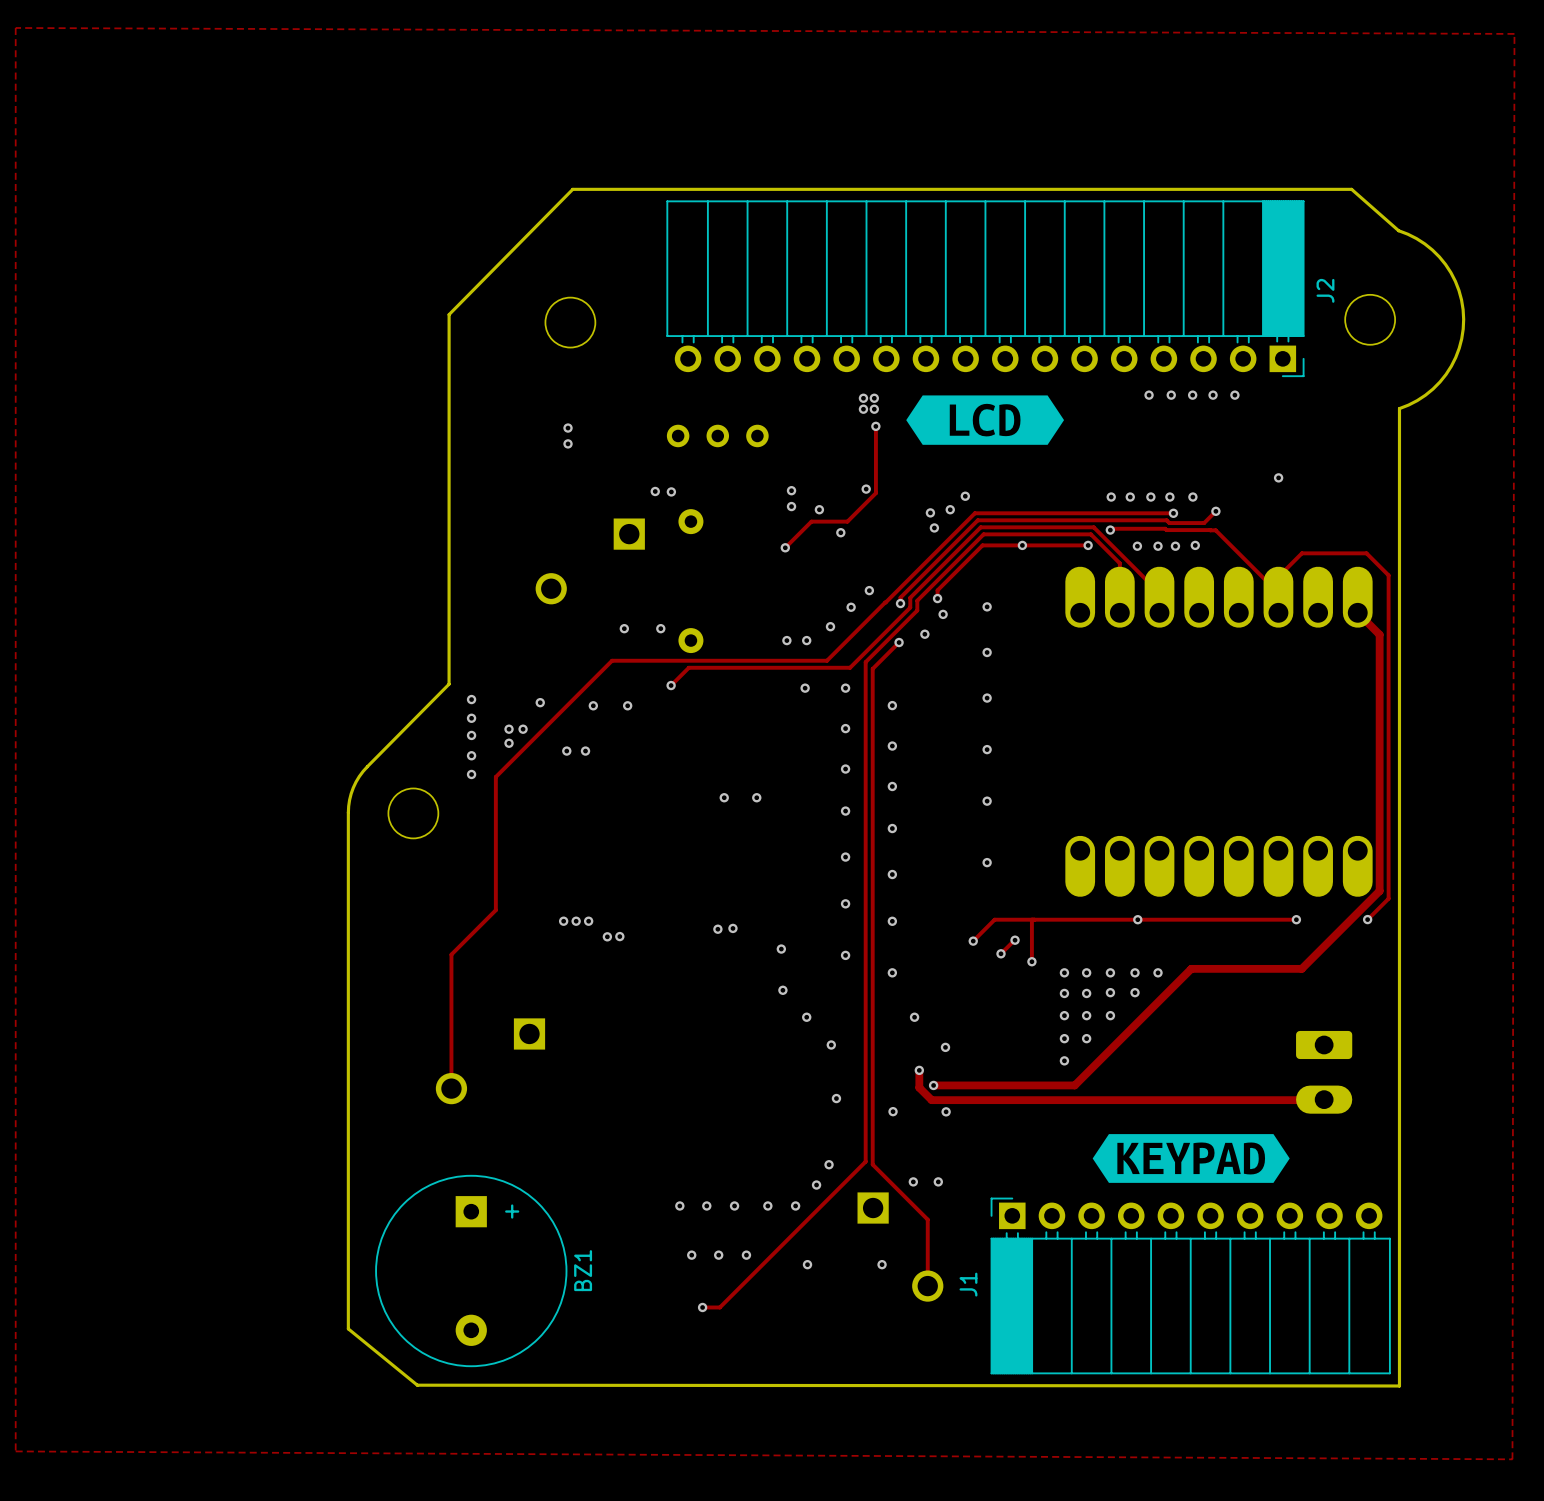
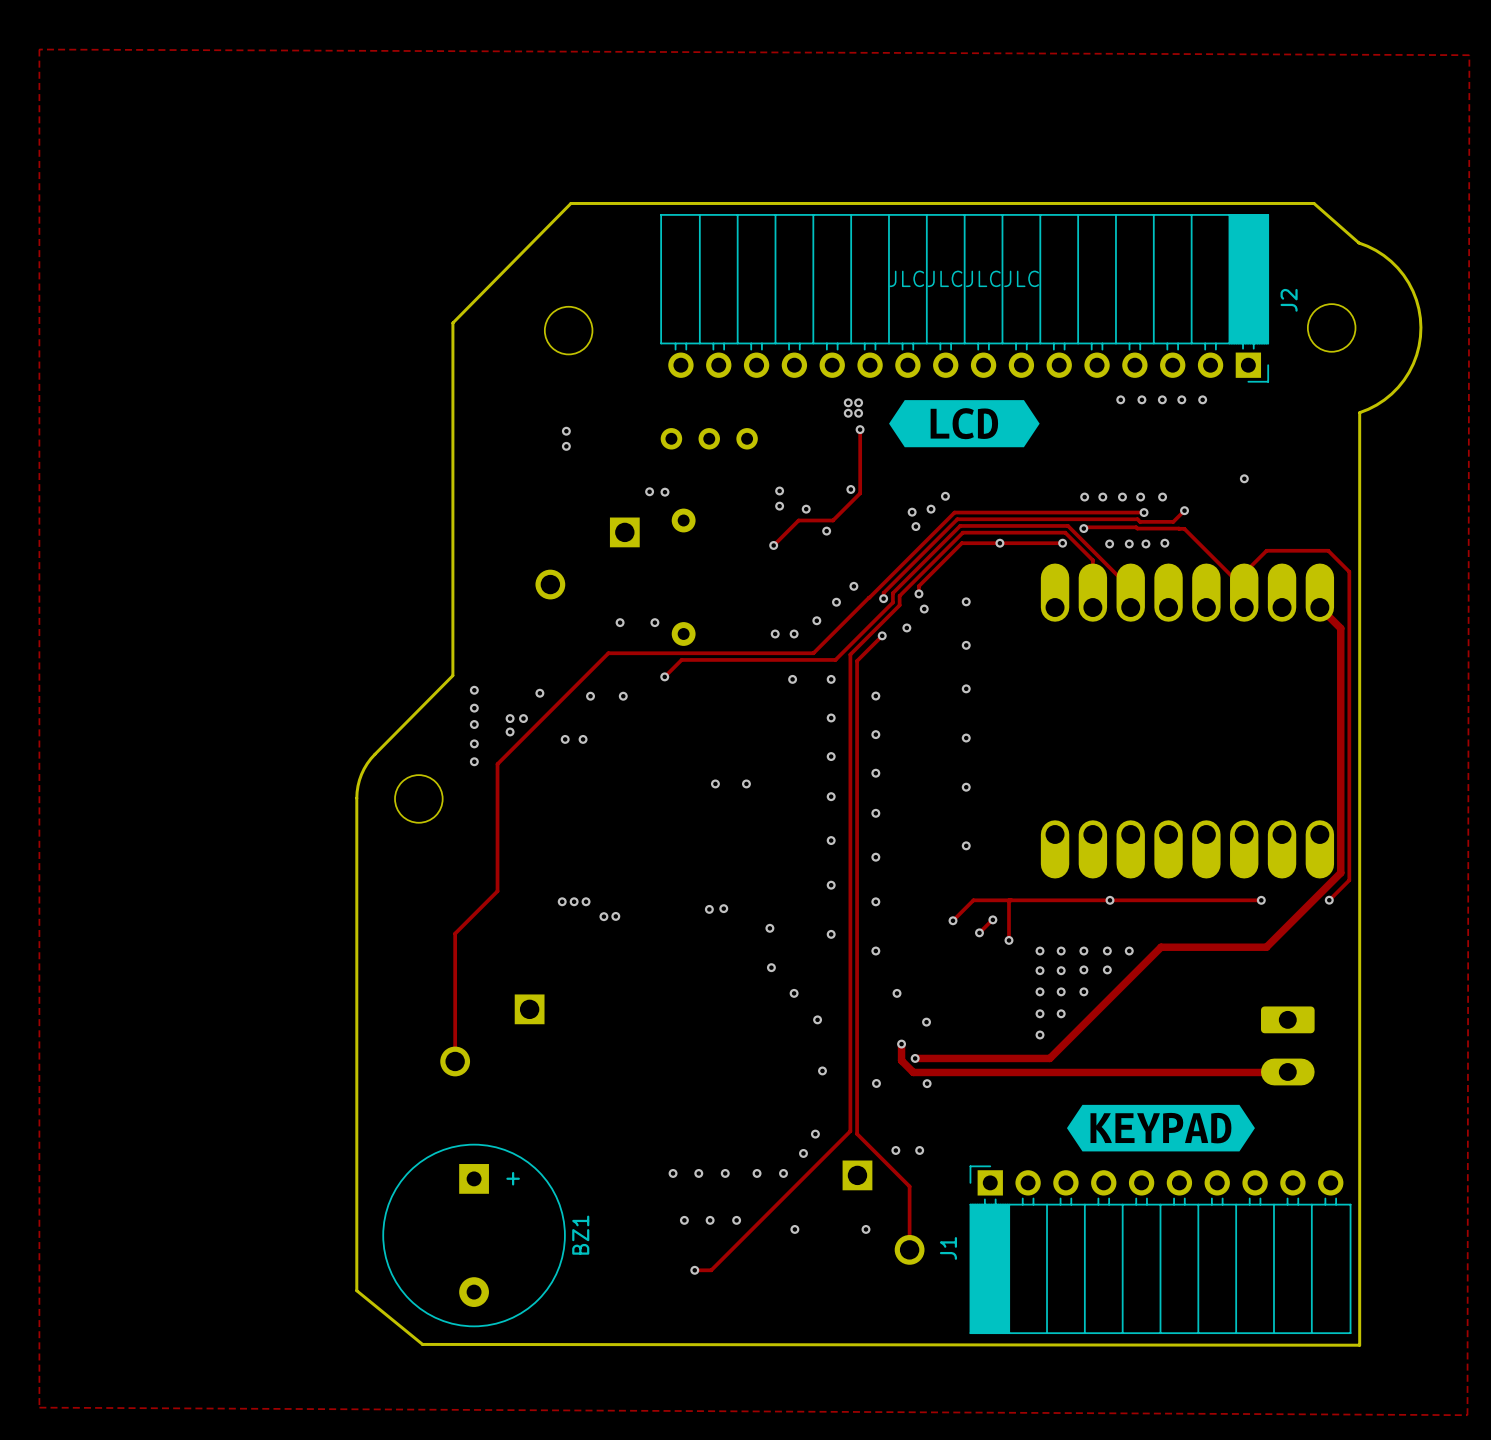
text: none -> JLCJLCJLCJLC (964, 278)

